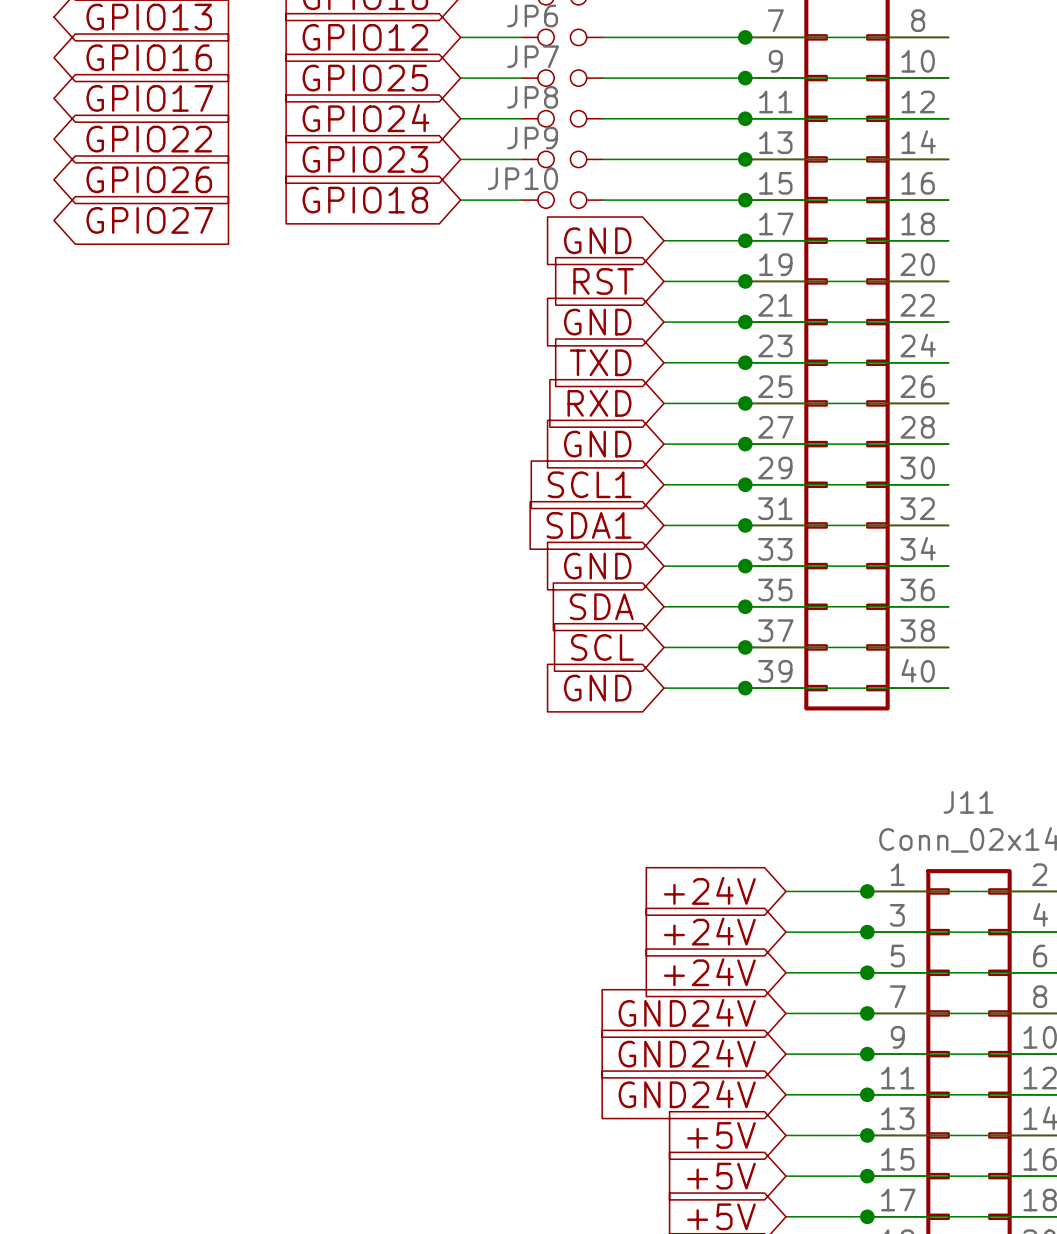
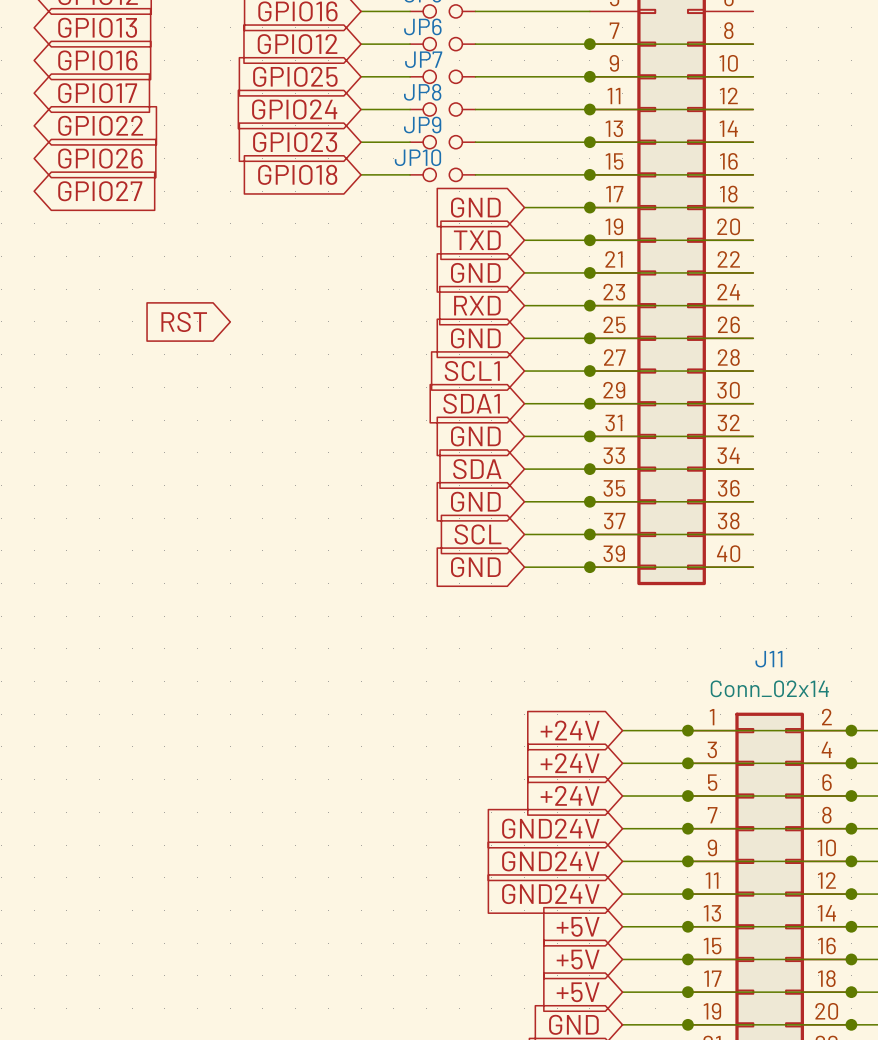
global label: RST (603, 281) -> TXD (477, 240)
global label: TXD (600, 362) -> RXD (477, 305)
global label: none -> RST (184, 321)
global label: RXD (599, 403) -> GND (475, 338)
global label: GND (597, 444) -> SCL1 (472, 371)
global label: SCL1 (589, 484) -> SDA1 (471, 403)
global label: SDA1 (589, 525) -> GND (475, 436)
global label: GND (597, 566) -> SDA (477, 469)
global label: SDA (601, 606) -> GND (475, 501)

